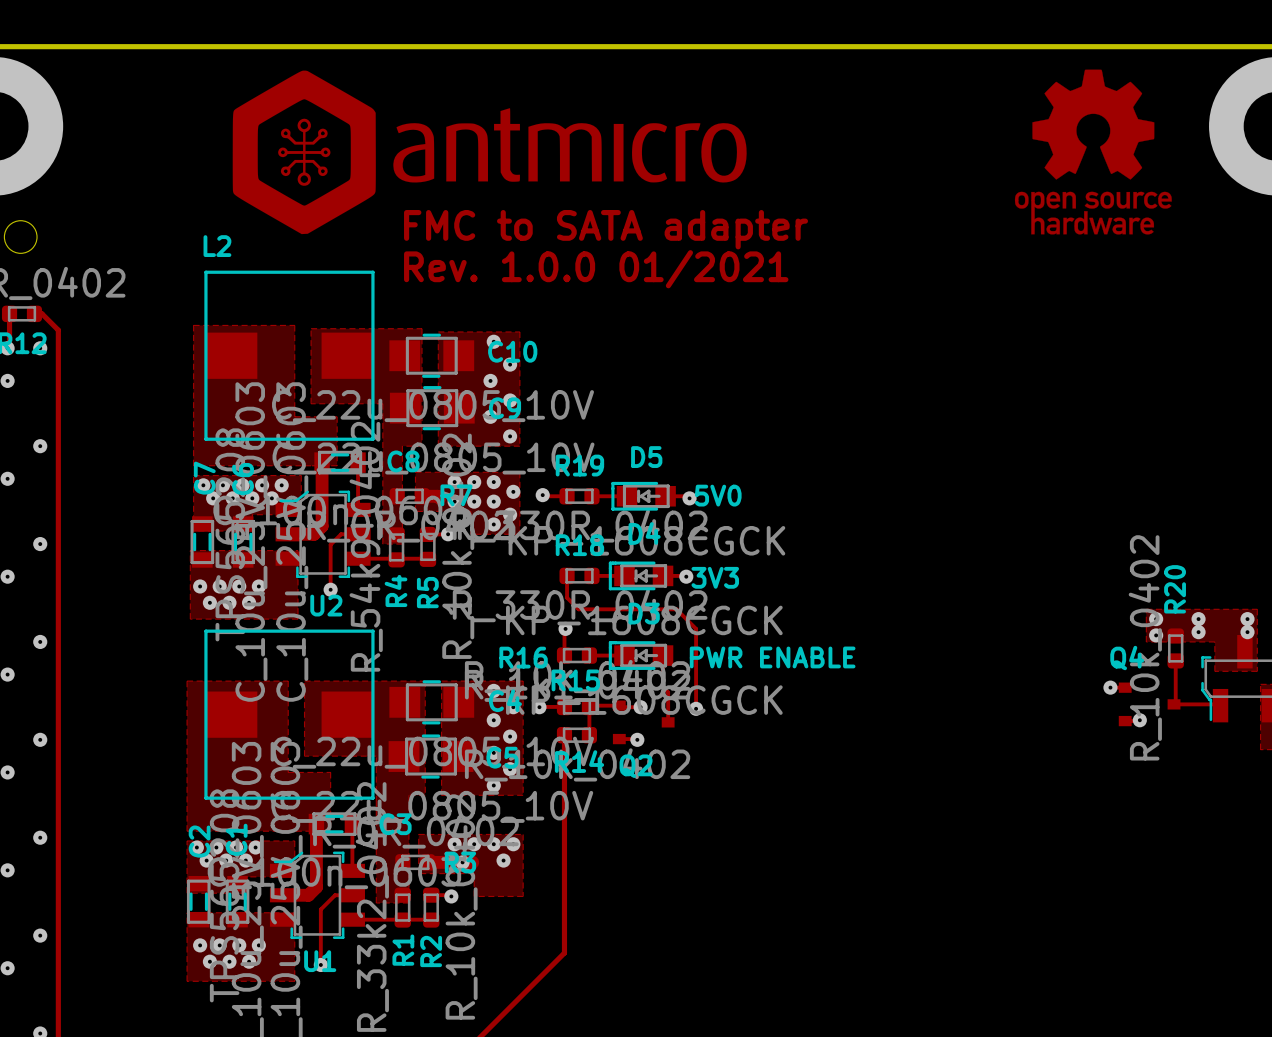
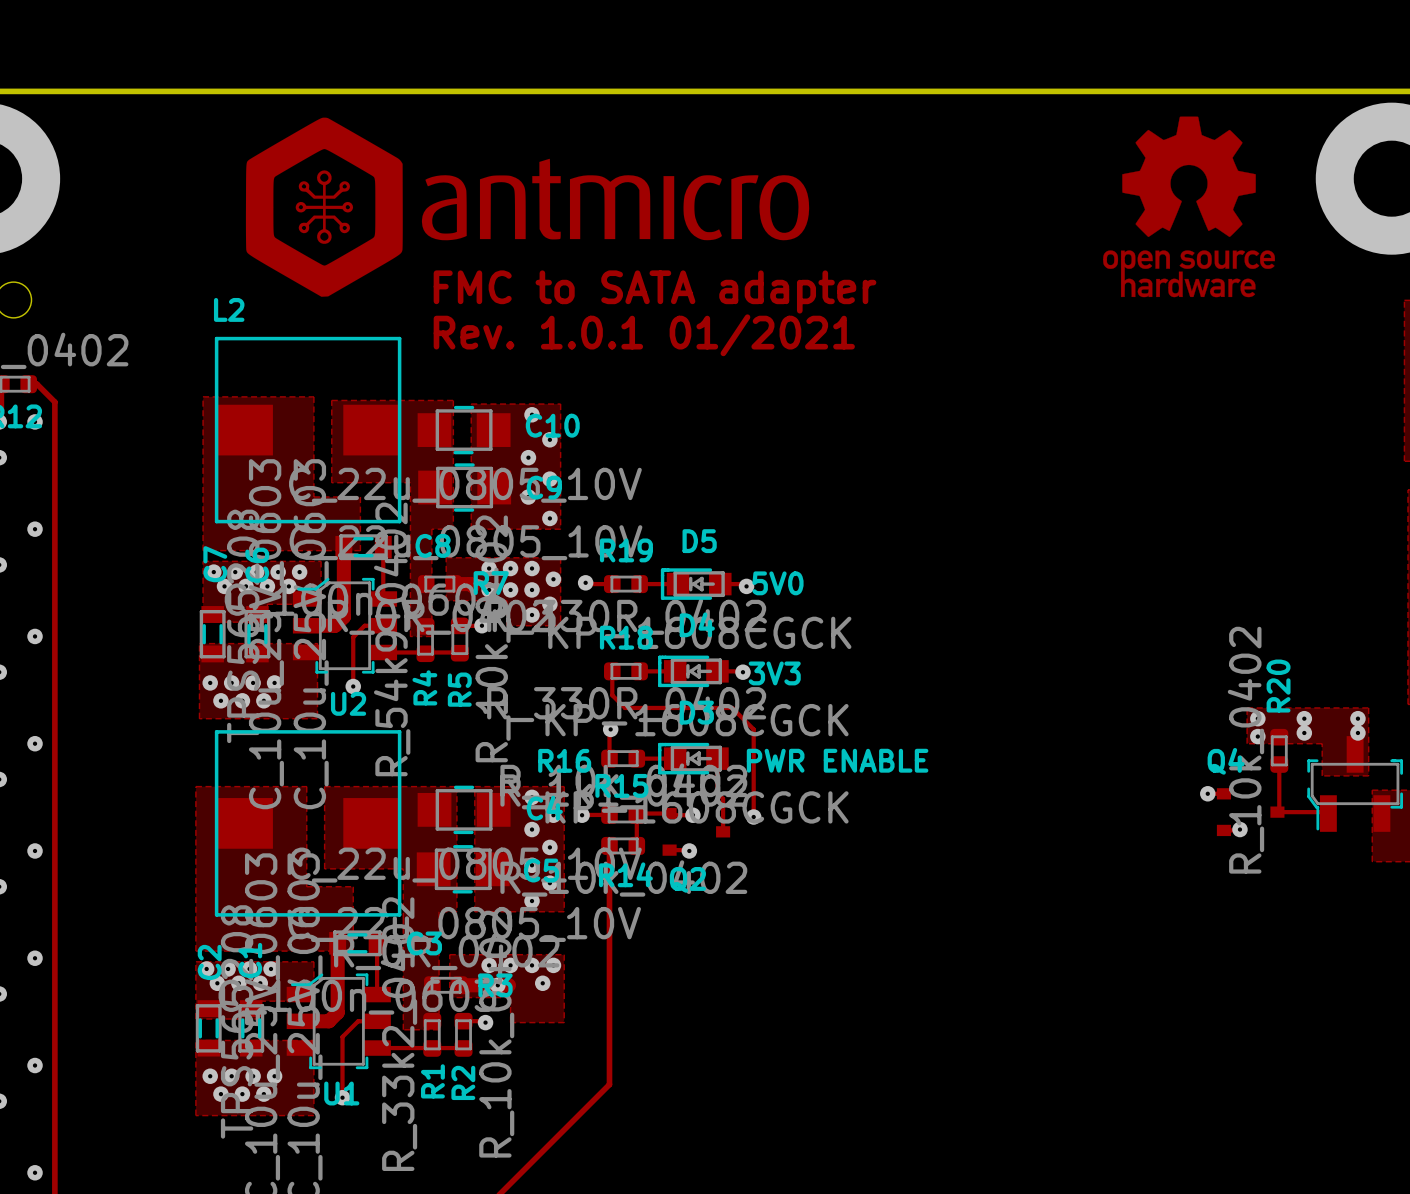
text: Rev. 1.0.0 01/2021 (596, 269) -> Rev. 1.0.1 01/2021 (644, 335)

